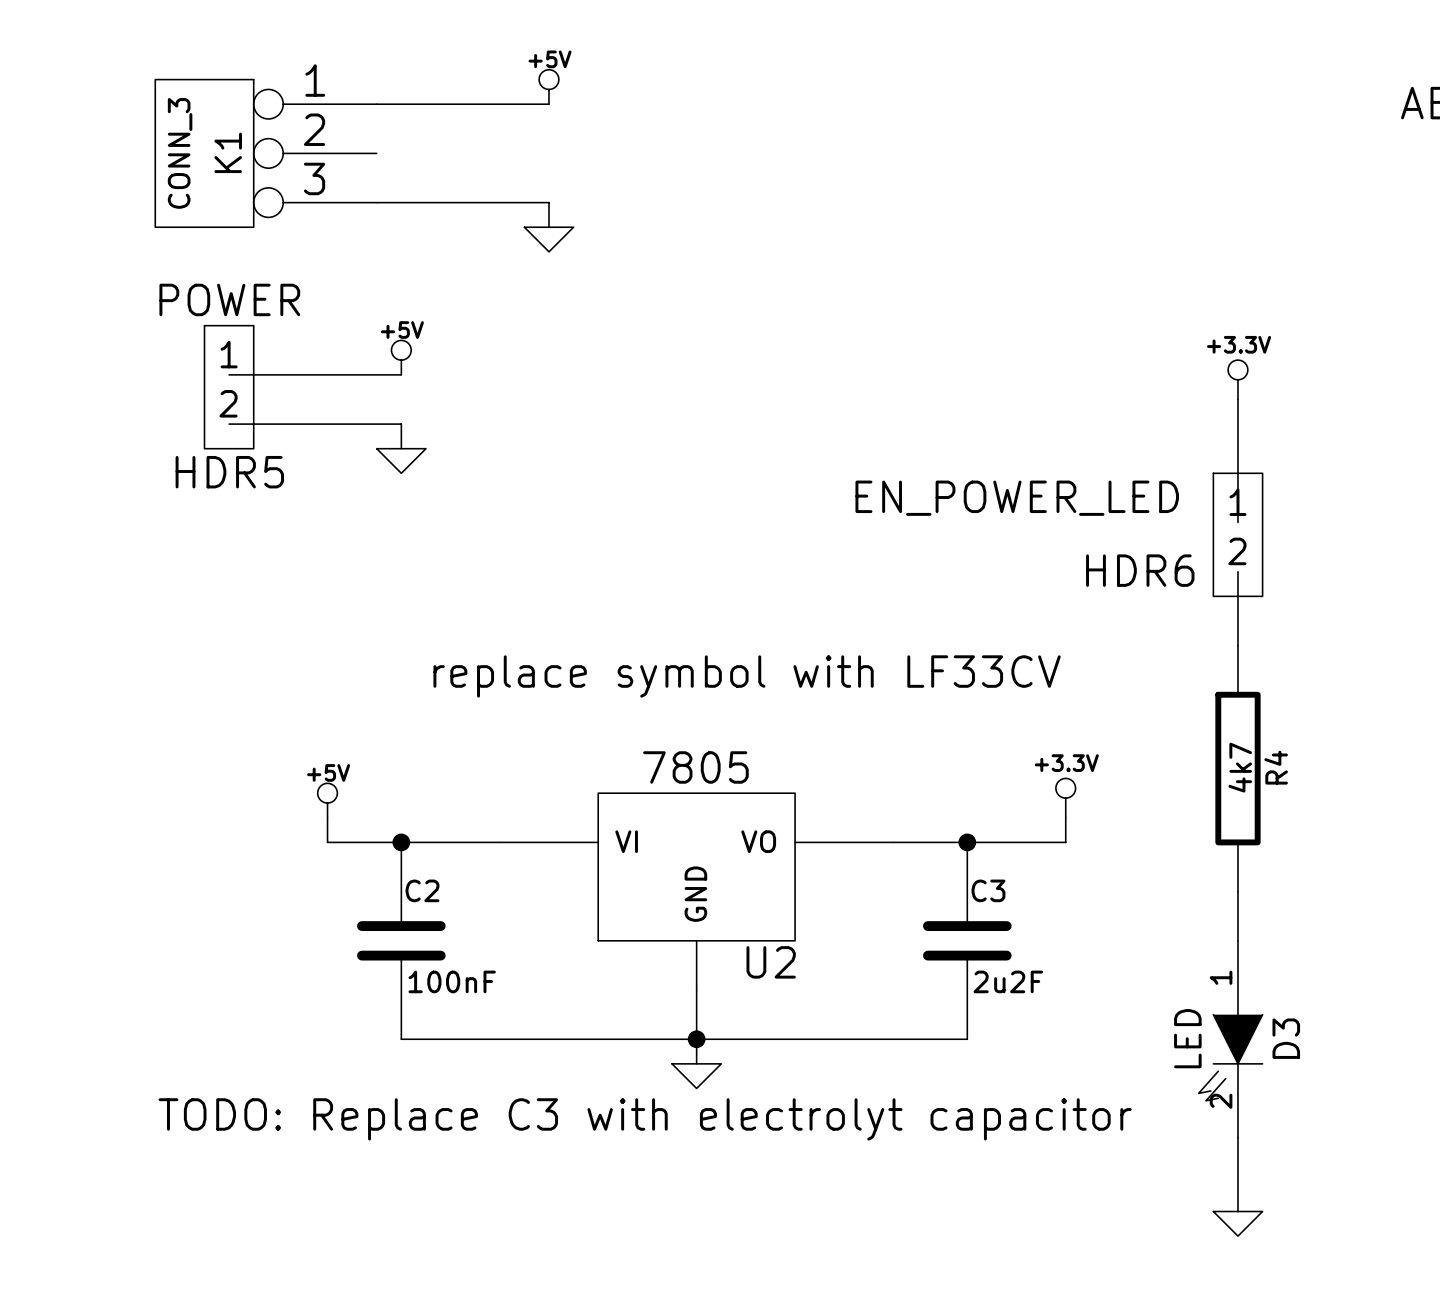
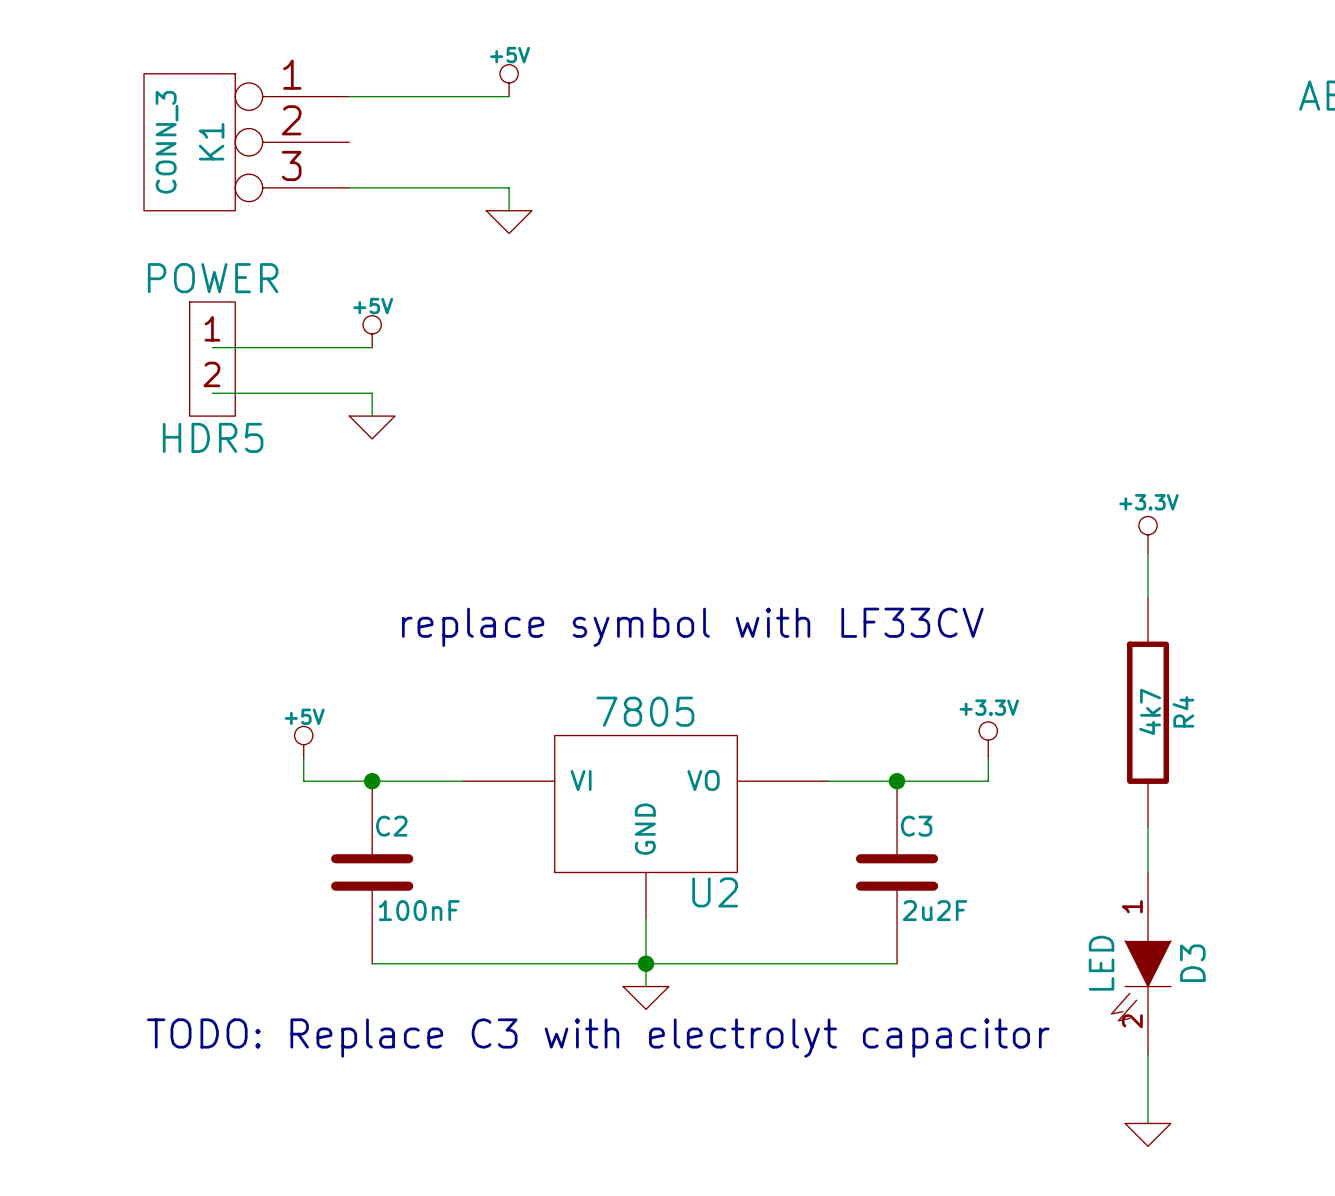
power symbol position: +3.3V (1237, 379) -> +3.3V (1148, 534)
wire: (1237, 399) (1237, 522) -> none
HDR6: EN_POWER_LED (1237, 534) -> none

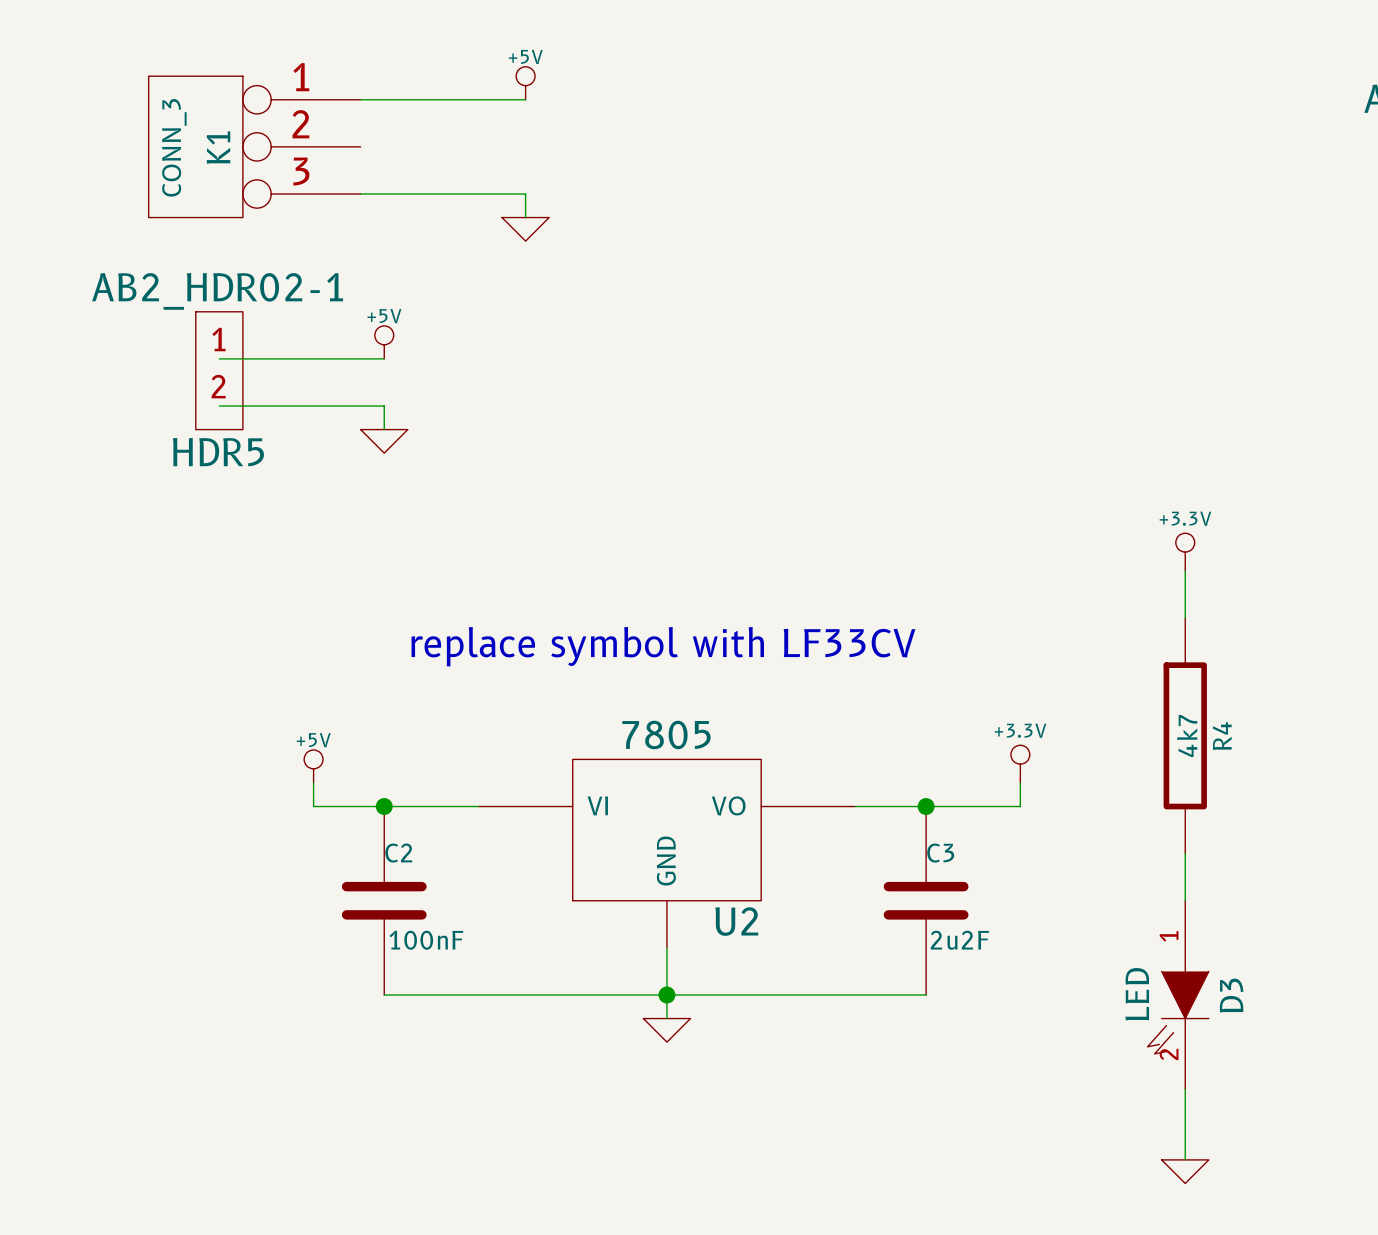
HDR5 value: POWER (213, 278) -> AB2_HDR02-1 (217, 291)
text: TODO: Replace C3 with electrolyt capacitor (598, 1038) -> none

